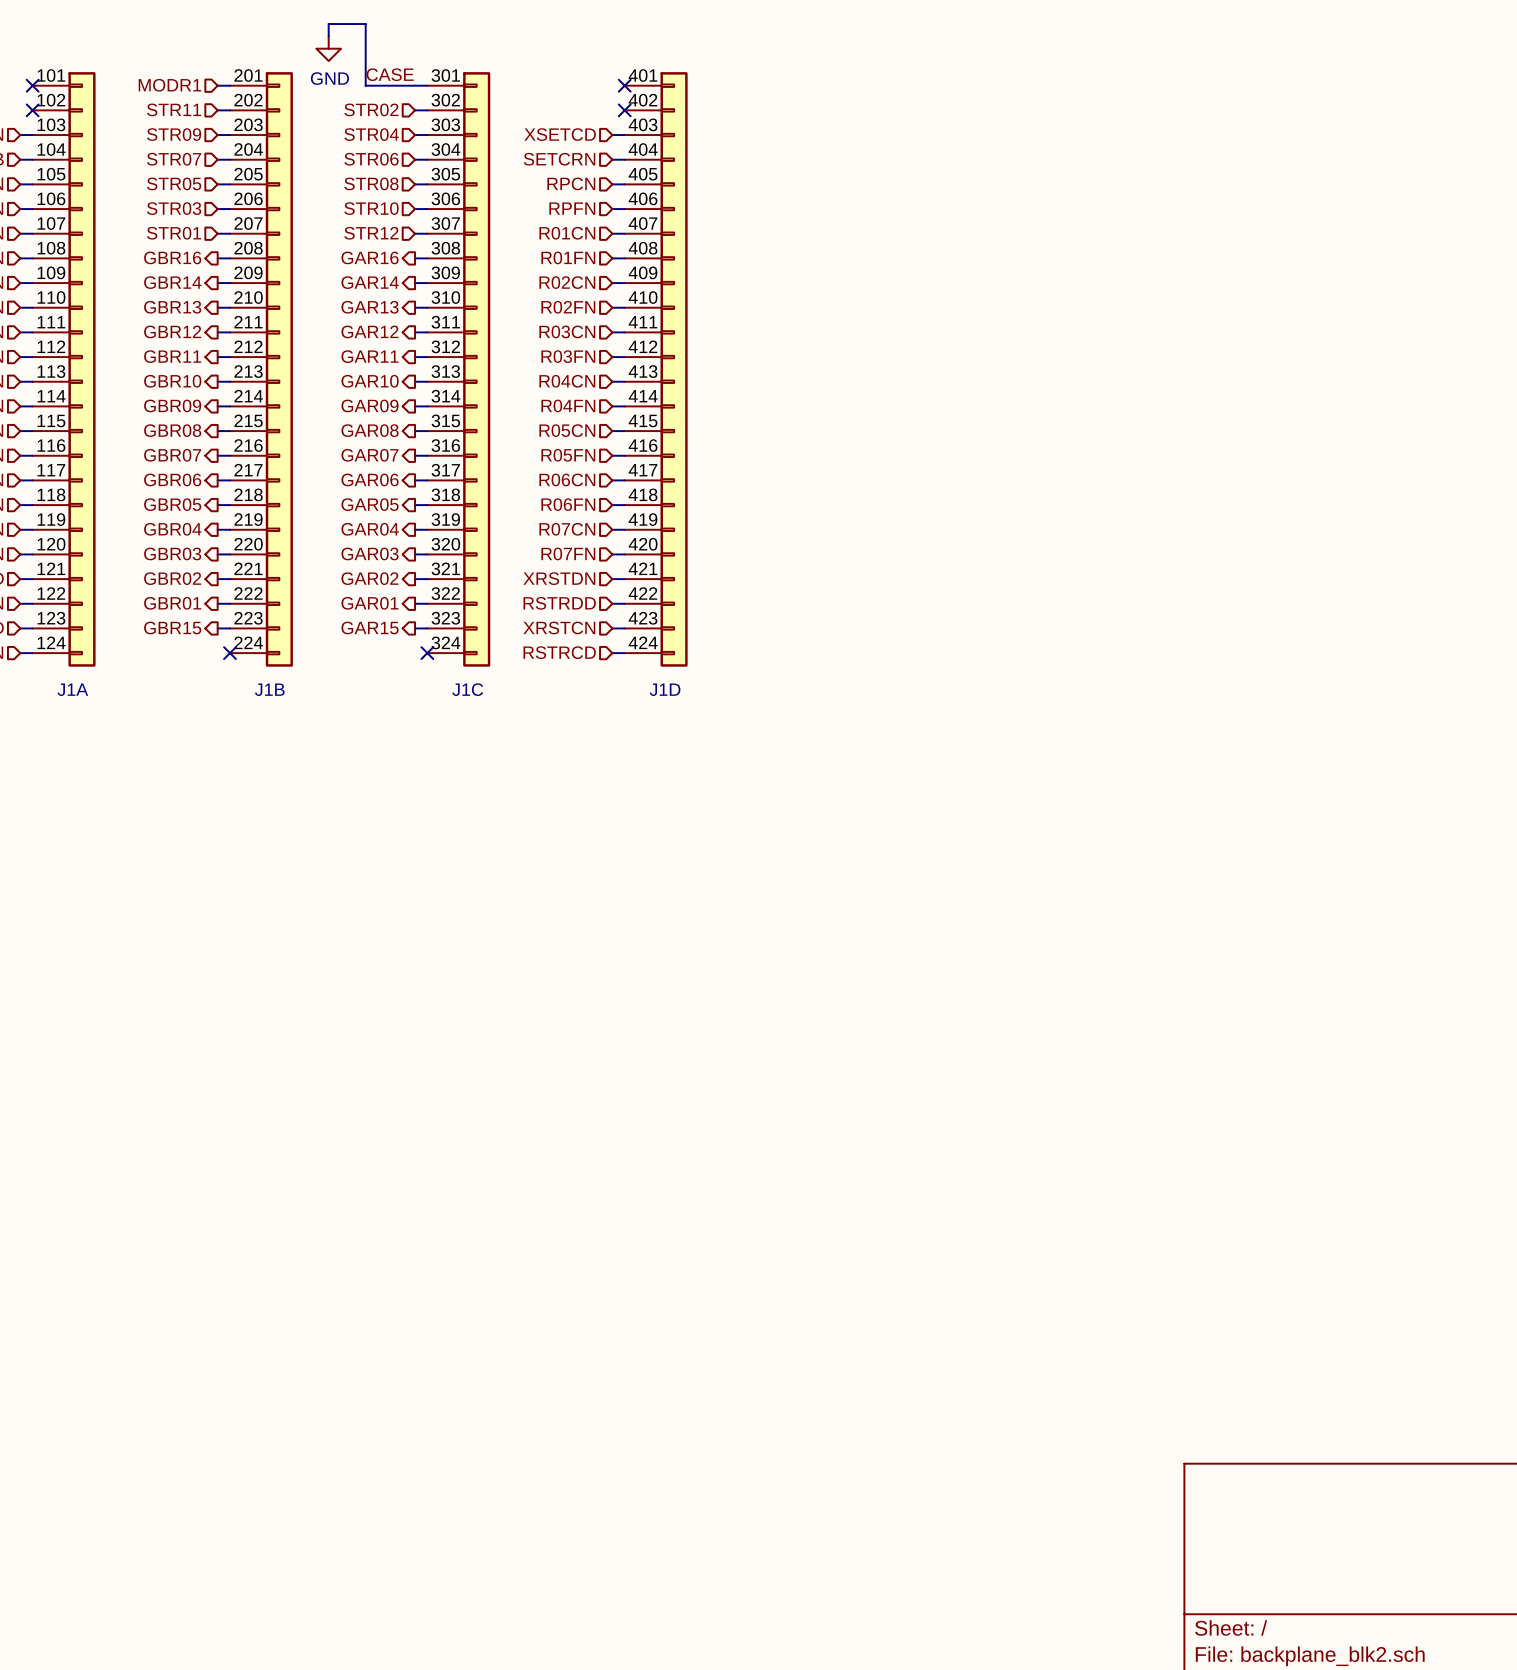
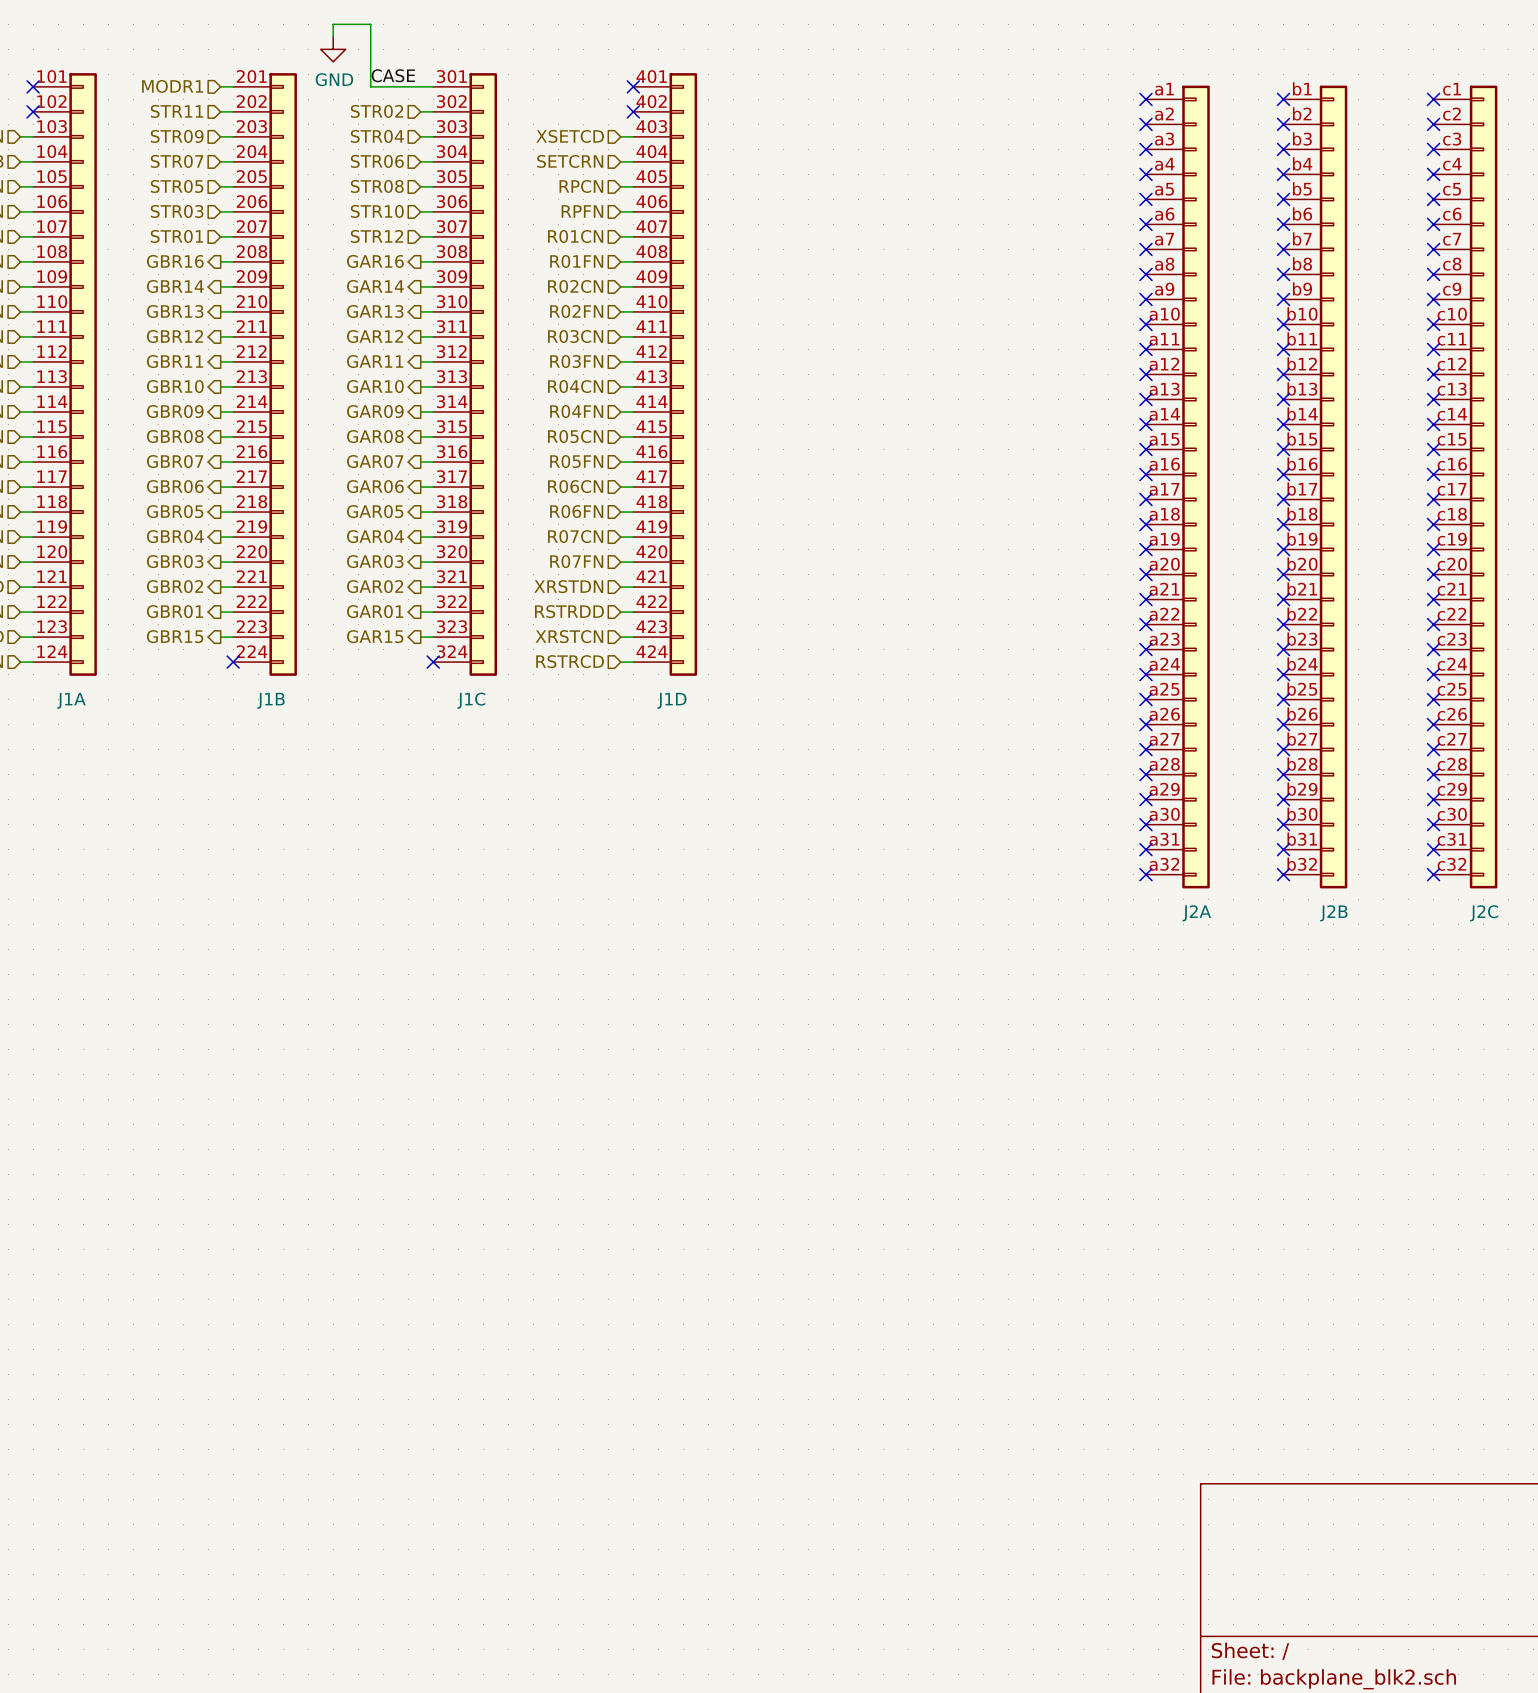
no-connect mark: none -> (1145, 99)
no-connect mark: none -> (1283, 99)
no-connect mark: none -> (1433, 99)
no-connect mark: none -> (1145, 124)
no-connect mark: none -> (1283, 124)
no-connect mark: none -> (1433, 124)
no-connect mark: none -> (1145, 149)
no-connect mark: none -> (1283, 149)
no-connect mark: none -> (1433, 149)
no-connect mark: none -> (1145, 174)
no-connect mark: none -> (1283, 174)
no-connect mark: none -> (1433, 174)
no-connect mark: none -> (1145, 199)
no-connect mark: none -> (1283, 199)
no-connect mark: none -> (1433, 199)
no-connect mark: none -> (1145, 224)
no-connect mark: none -> (1283, 224)
no-connect mark: none -> (1433, 224)
no-connect mark: none -> (1145, 249)
no-connect mark: none -> (1283, 249)
no-connect mark: none -> (1433, 249)
no-connect mark: none -> (1145, 274)
no-connect mark: none -> (1283, 274)
no-connect mark: none -> (1433, 274)
no-connect mark: none -> (1145, 299)
no-connect mark: none -> (1283, 299)
no-connect mark: none -> (1433, 299)
no-connect mark: none -> (1145, 324)
no-connect mark: none -> (1283, 324)
no-connect mark: none -> (1433, 324)
no-connect mark: none -> (1145, 349)
no-connect mark: none -> (1283, 349)
no-connect mark: none -> (1433, 349)
no-connect mark: none -> (1145, 374)
no-connect mark: none -> (1283, 374)
no-connect mark: none -> (1433, 374)
no-connect mark: none -> (1145, 399)
no-connect mark: none -> (1283, 399)
no-connect mark: none -> (1433, 399)
no-connect mark: none -> (1145, 424)
no-connect mark: none -> (1283, 424)
no-connect mark: none -> (1433, 424)
no-connect mark: none -> (1145, 449)
no-connect mark: none -> (1283, 449)
no-connect mark: none -> (1433, 449)
no-connect mark: none -> (1145, 474)
no-connect mark: none -> (1283, 474)
no-connect mark: none -> (1433, 474)
J2A: none -> (1177, 487)
J2B: none -> (1315, 487)
J2C: none -> (1465, 487)
no-connect mark: none -> (1145, 499)
no-connect mark: none -> (1283, 499)
no-connect mark: none -> (1433, 499)
no-connect mark: none -> (1145, 524)
no-connect mark: none -> (1283, 524)
no-connect mark: none -> (1433, 524)
no-connect mark: none -> (1145, 549)
no-connect mark: none -> (1283, 549)
no-connect mark: none -> (1433, 549)
no-connect mark: none -> (1145, 574)
no-connect mark: none -> (1283, 574)
no-connect mark: none -> (1433, 574)
no-connect mark: none -> (1145, 599)
no-connect mark: none -> (1283, 599)
no-connect mark: none -> (1433, 599)
no-connect mark: none -> (1145, 624)
no-connect mark: none -> (1283, 624)
no-connect mark: none -> (1433, 624)
no-connect mark: none -> (1145, 649)
no-connect mark: none -> (1283, 649)
no-connect mark: none -> (1433, 649)
no-connect mark: none -> (1145, 674)
no-connect mark: none -> (1283, 674)
no-connect mark: none -> (1433, 674)
no-connect mark: none -> (1145, 699)
no-connect mark: none -> (1283, 699)
no-connect mark: none -> (1433, 699)
no-connect mark: none -> (1145, 724)
no-connect mark: none -> (1283, 724)
no-connect mark: none -> (1433, 724)
no-connect mark: none -> (1145, 749)
no-connect mark: none -> (1283, 749)
no-connect mark: none -> (1433, 749)
no-connect mark: none -> (1145, 774)
no-connect mark: none -> (1283, 774)
no-connect mark: none -> (1433, 774)
no-connect mark: none -> (1145, 799)
no-connect mark: none -> (1283, 799)
no-connect mark: none -> (1433, 799)
no-connect mark: none -> (1145, 824)
no-connect mark: none -> (1283, 824)
no-connect mark: none -> (1433, 824)
no-connect mark: none -> (1145, 849)
no-connect mark: none -> (1283, 849)
no-connect mark: none -> (1433, 849)
no-connect mark: none -> (1145, 874)
no-connect mark: none -> (1283, 874)
no-connect mark: none -> (1433, 874)

